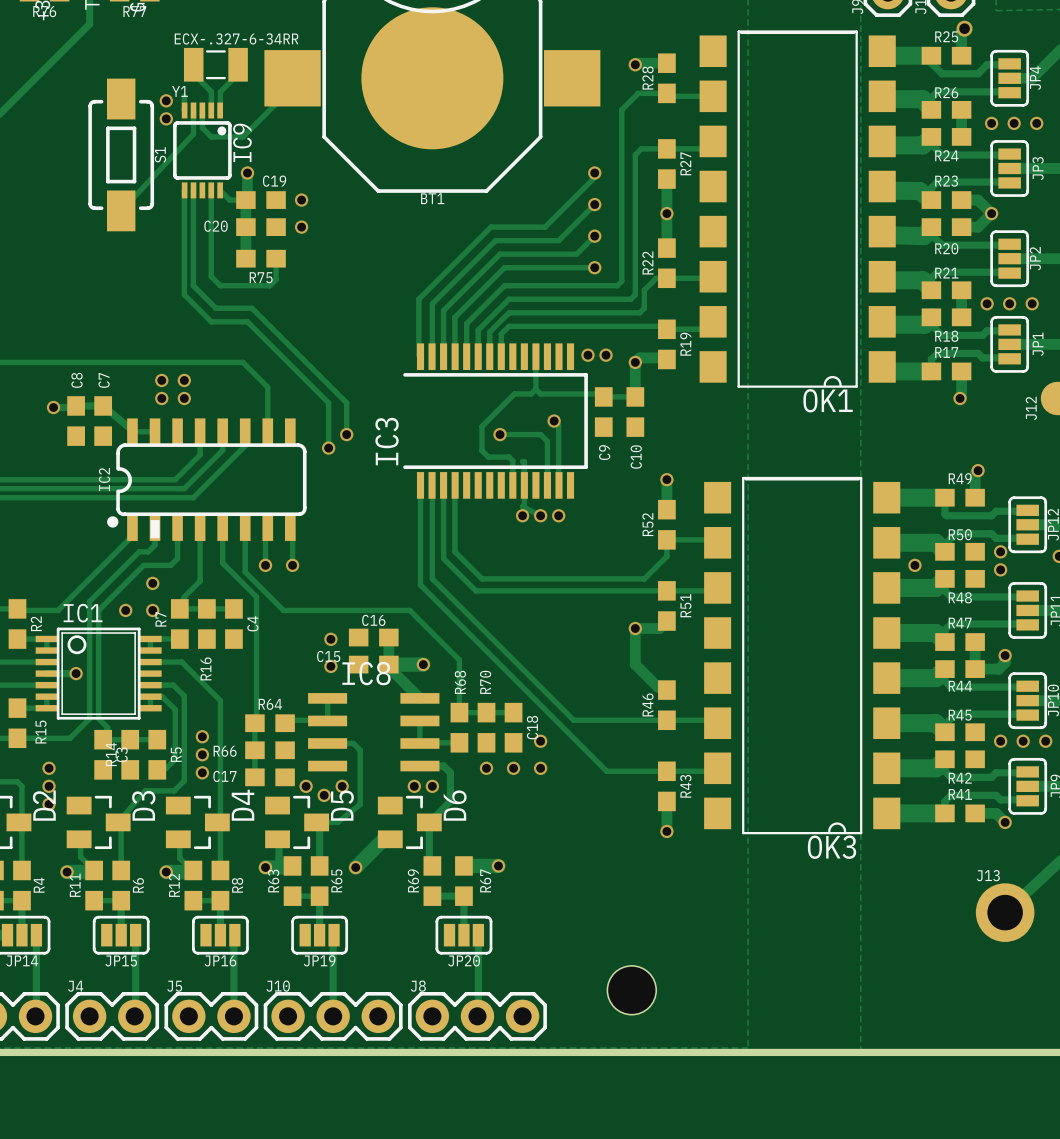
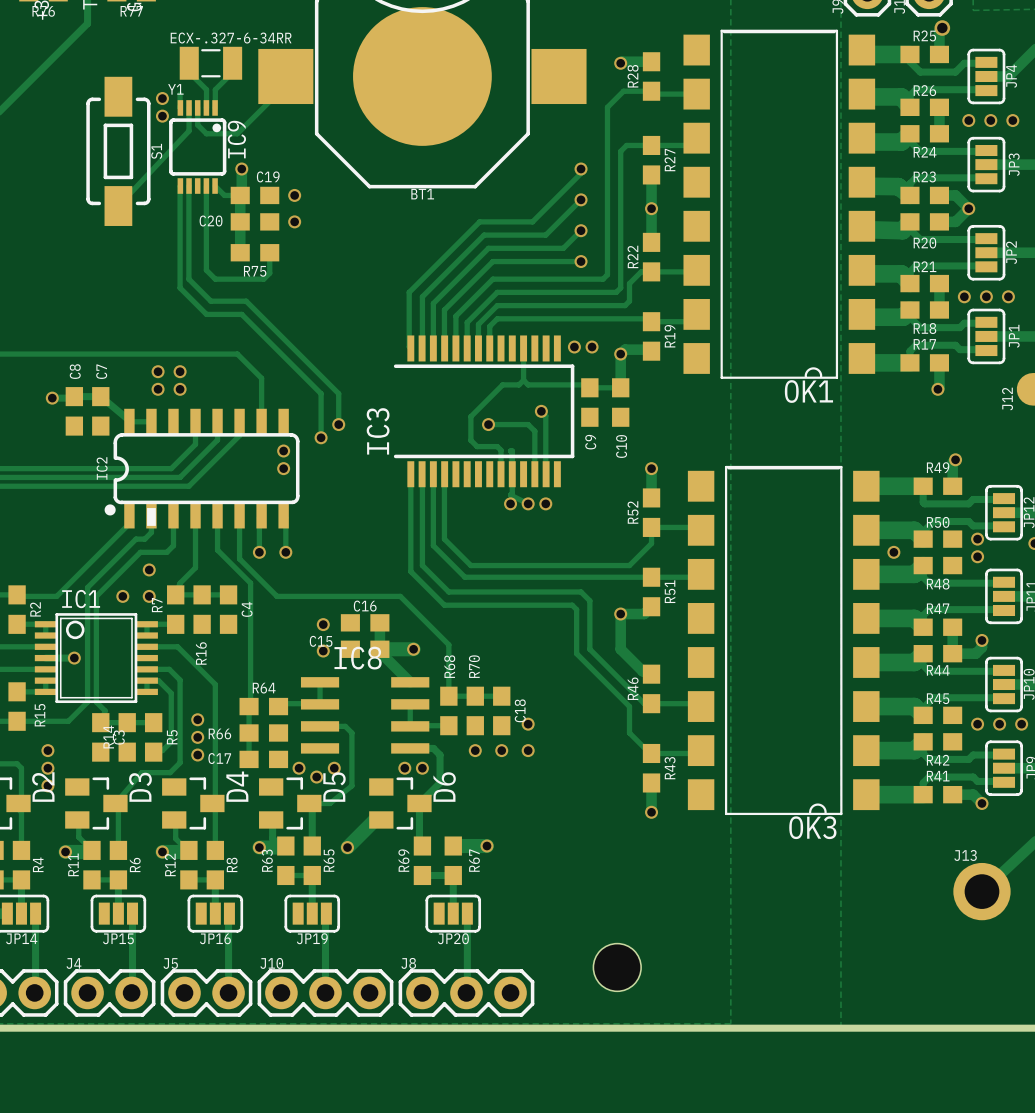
via: none -> (283, 451)
via: none -> (283, 468)
track: (459, 605) (573, 720) (659, 720) -> (448, 591) (581, 591) (589, 600) (589, 649) (644, 703)
track: (454, 619) (606, 771) (665, 771) -> (444, 605) (572, 605) (576, 609) (576, 653) (629, 706) (629, 732) (650, 753)

